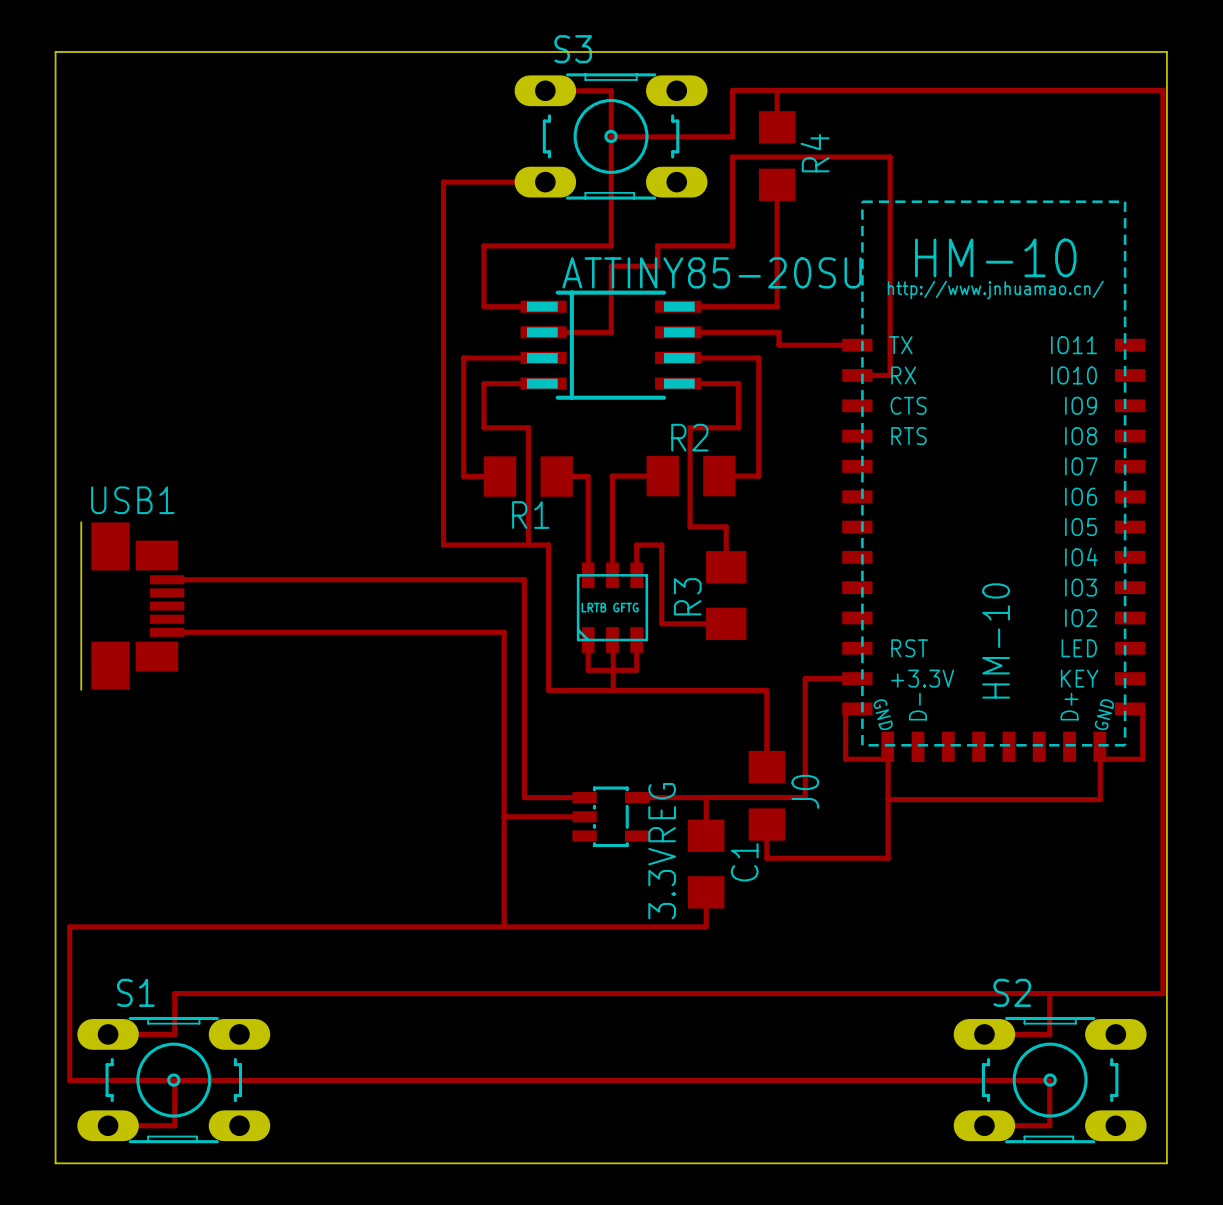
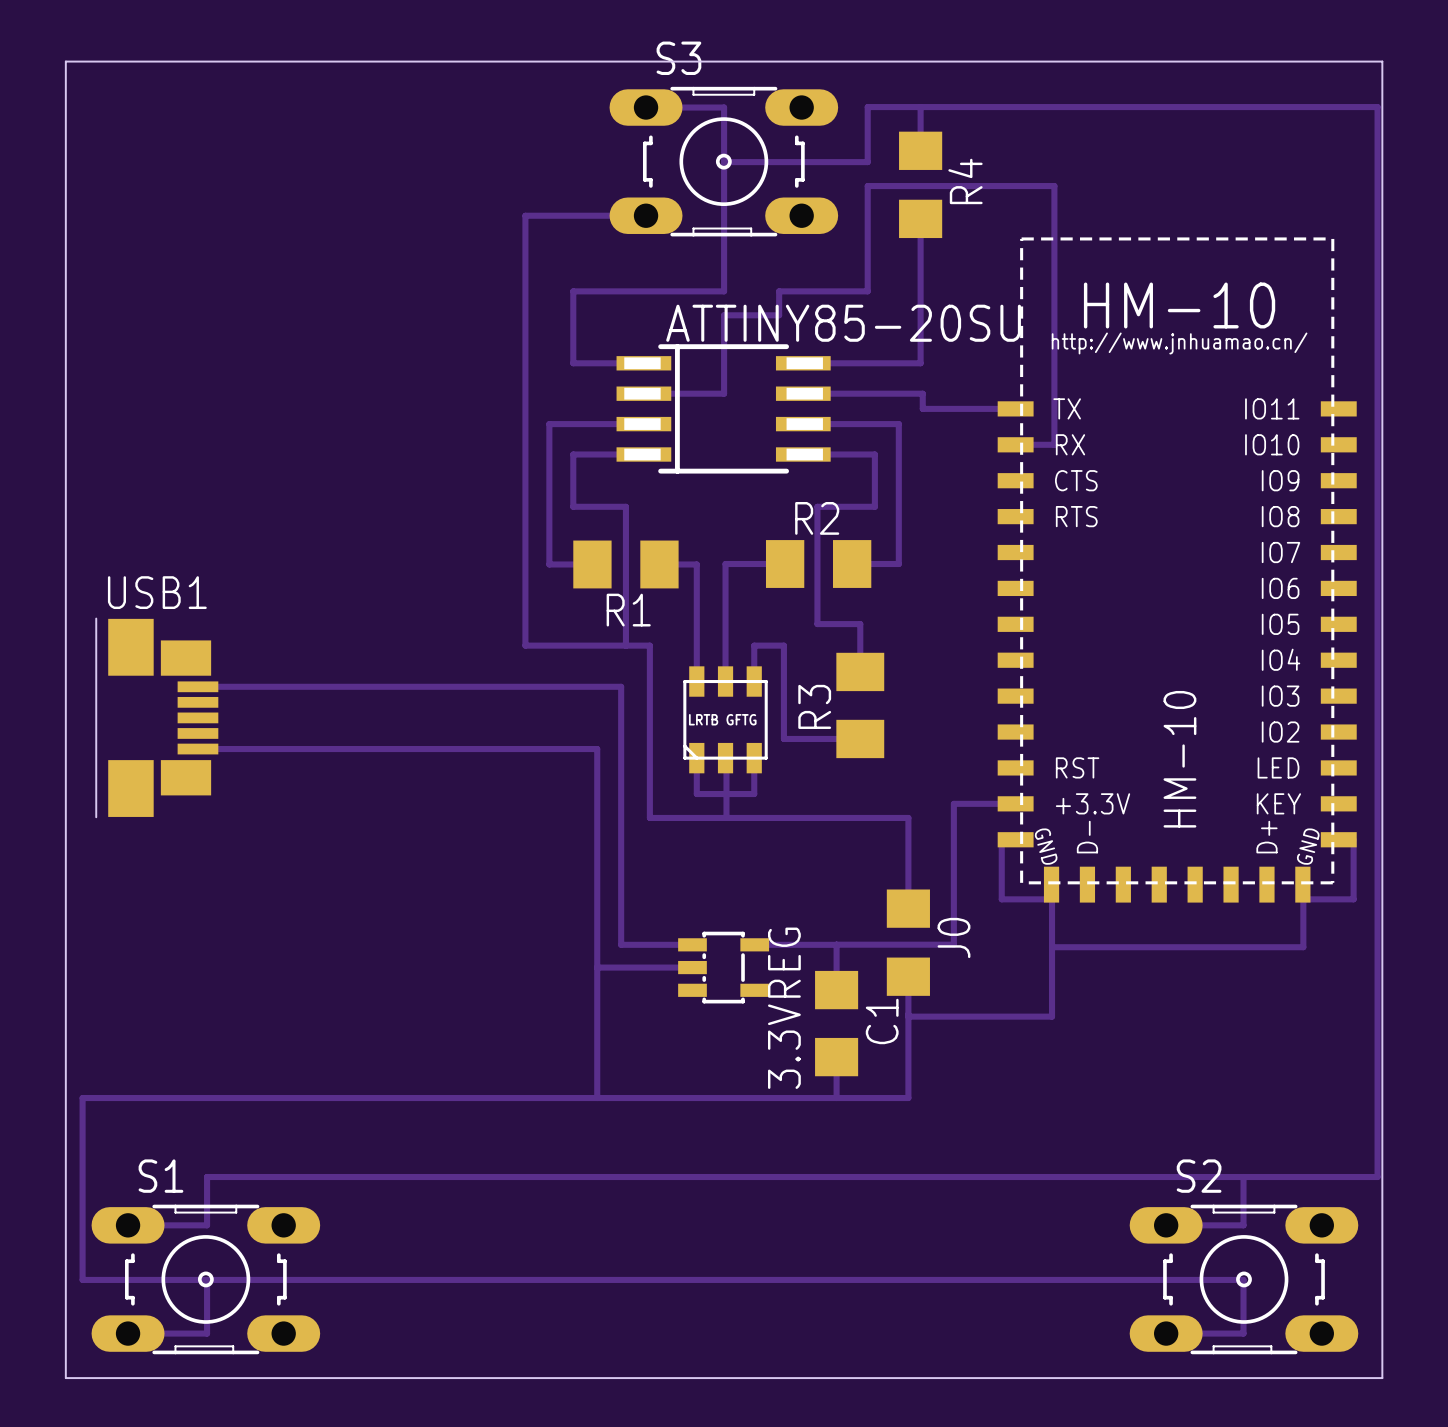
track: none -> (908, 1016) (908, 1098) (836, 1098)

